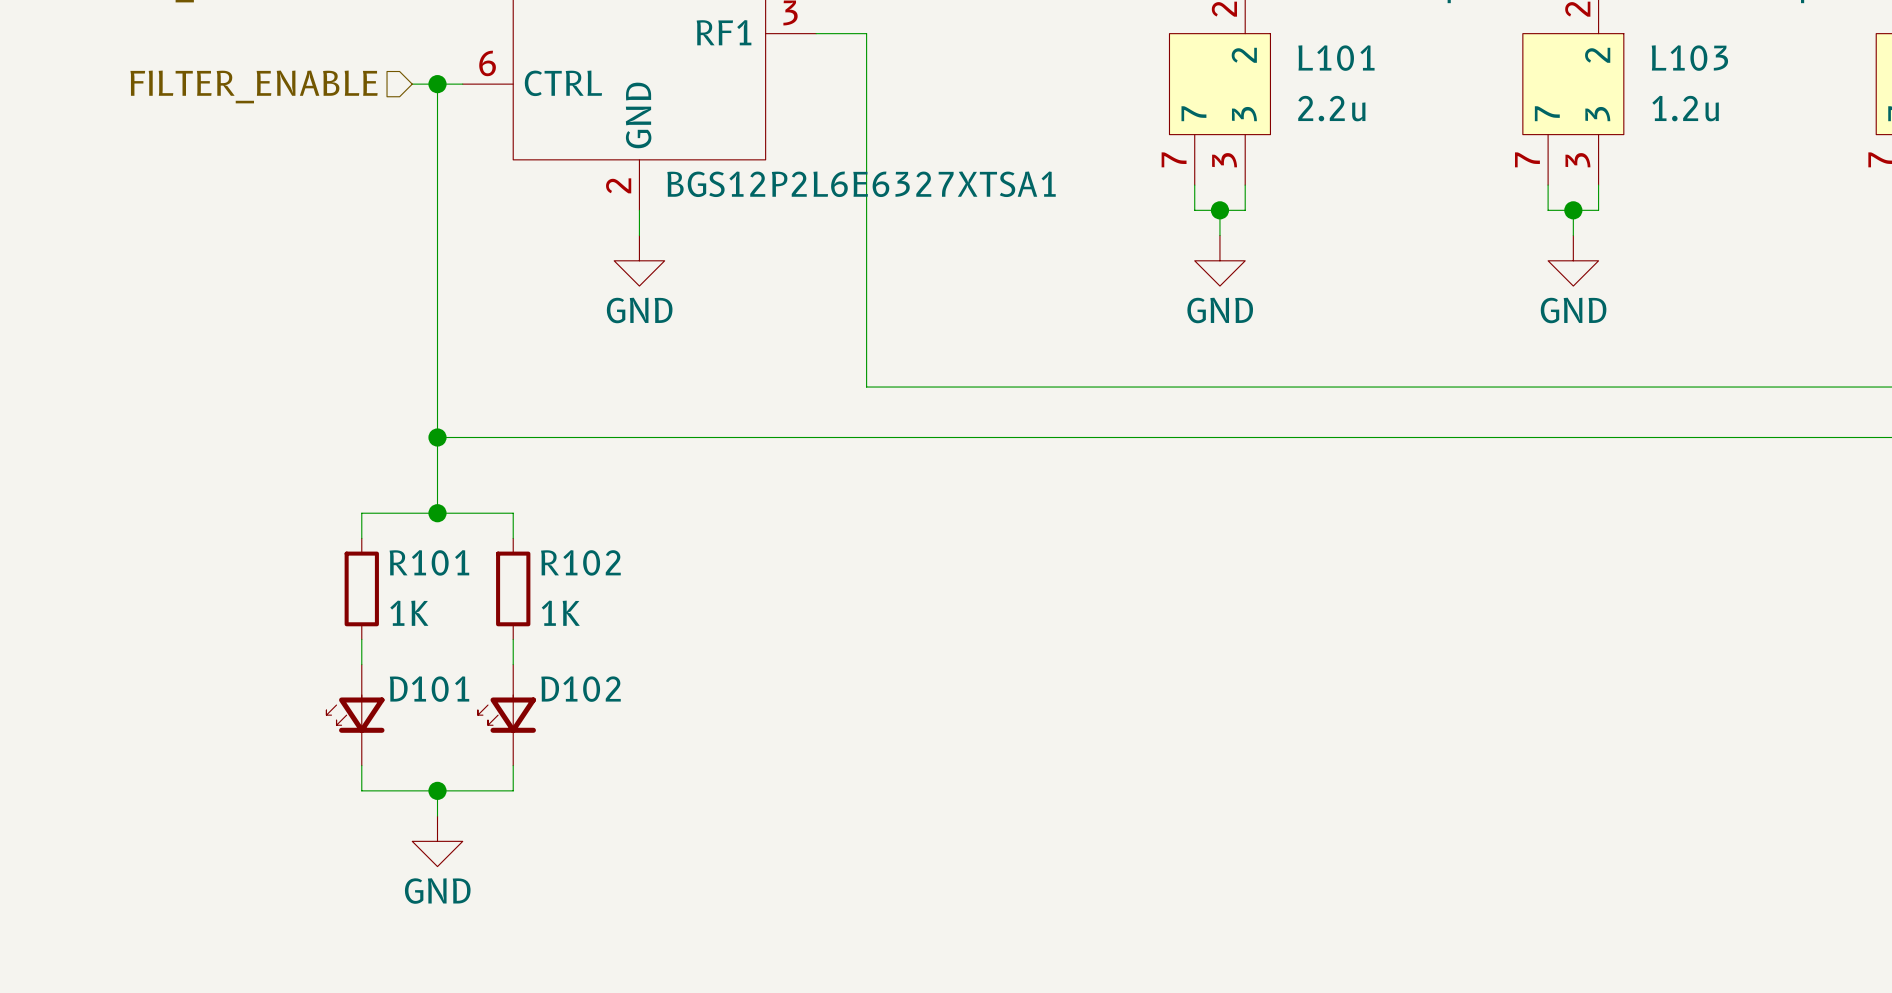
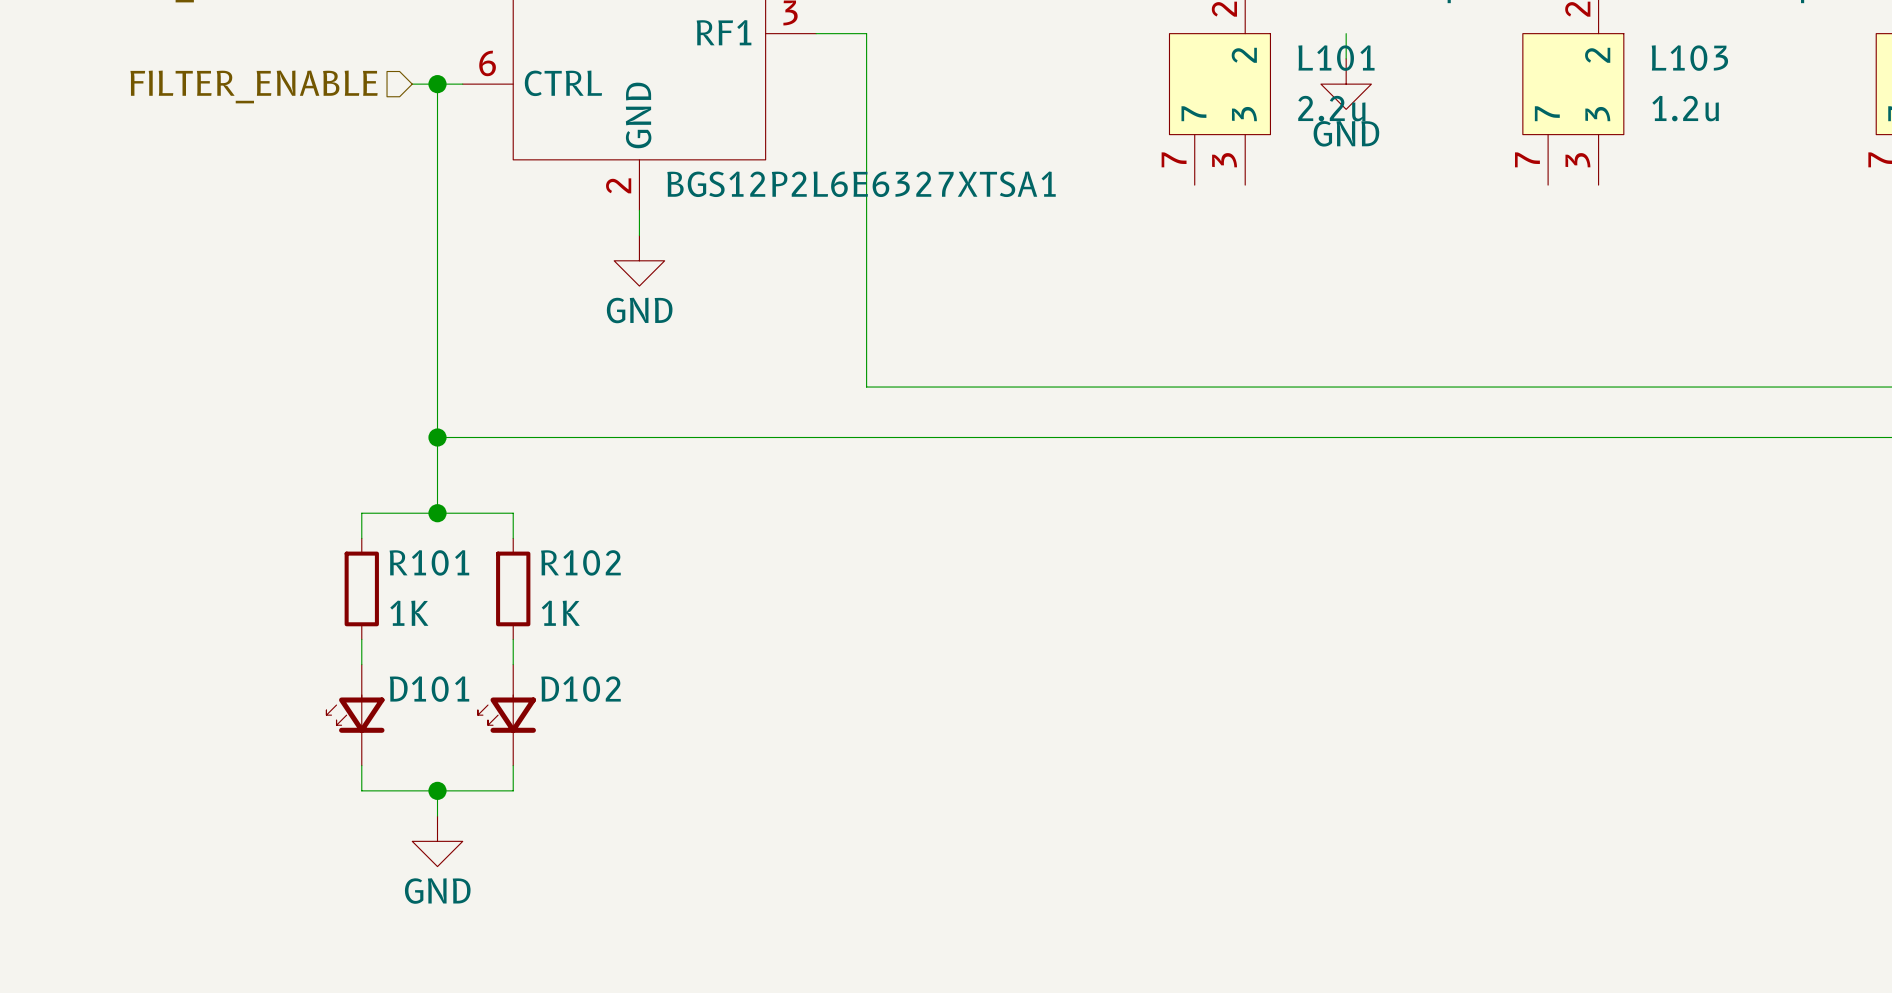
power symbol: none -> GND (1346, 84)
wire: (1194, 185) (1194, 210) (1245, 210) (1245, 185) -> none
wire: (1548, 185) (1548, 210) (1598, 210) (1598, 185) -> none
wire: (1219, 210) (1219, 235) -> (1346, 33) (1346, 58)
junction: (1219, 210) -> none
wire: (1573, 210) (1573, 235) -> none
junction: (1573, 210) -> none
power symbol: GND (1219, 260) -> none
power symbol: GND (1573, 260) -> none

